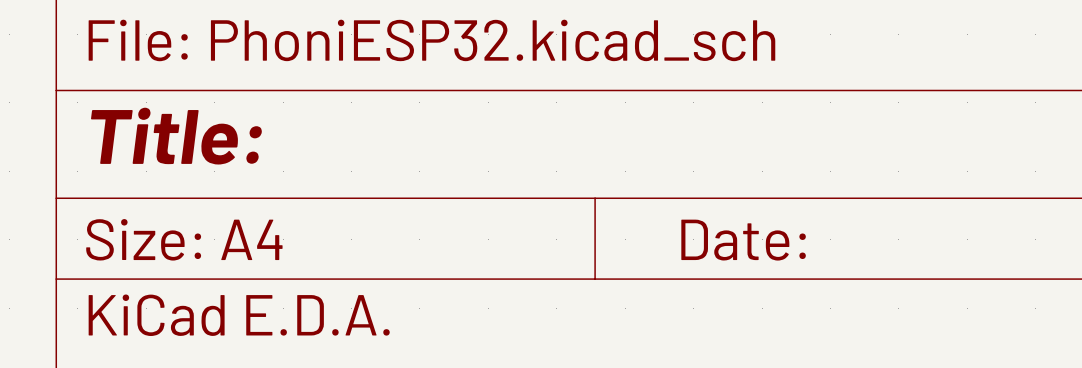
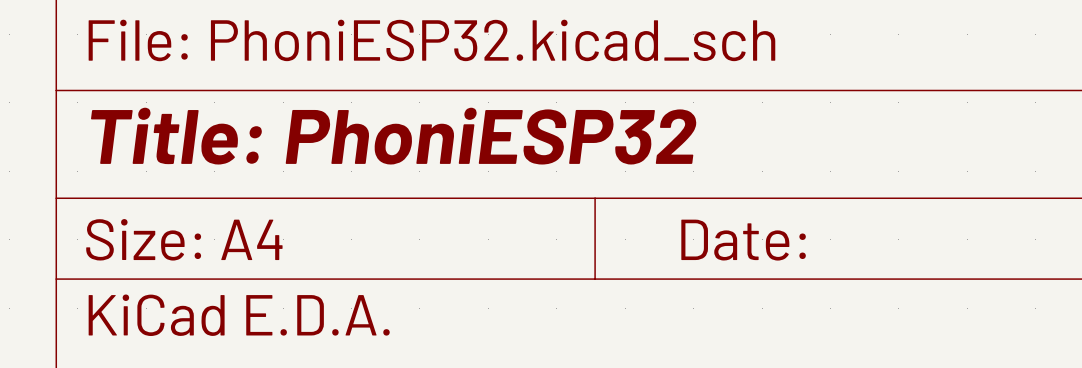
title block: Title: (176, 136) -> Title: PhoniESP32 (393, 136)

